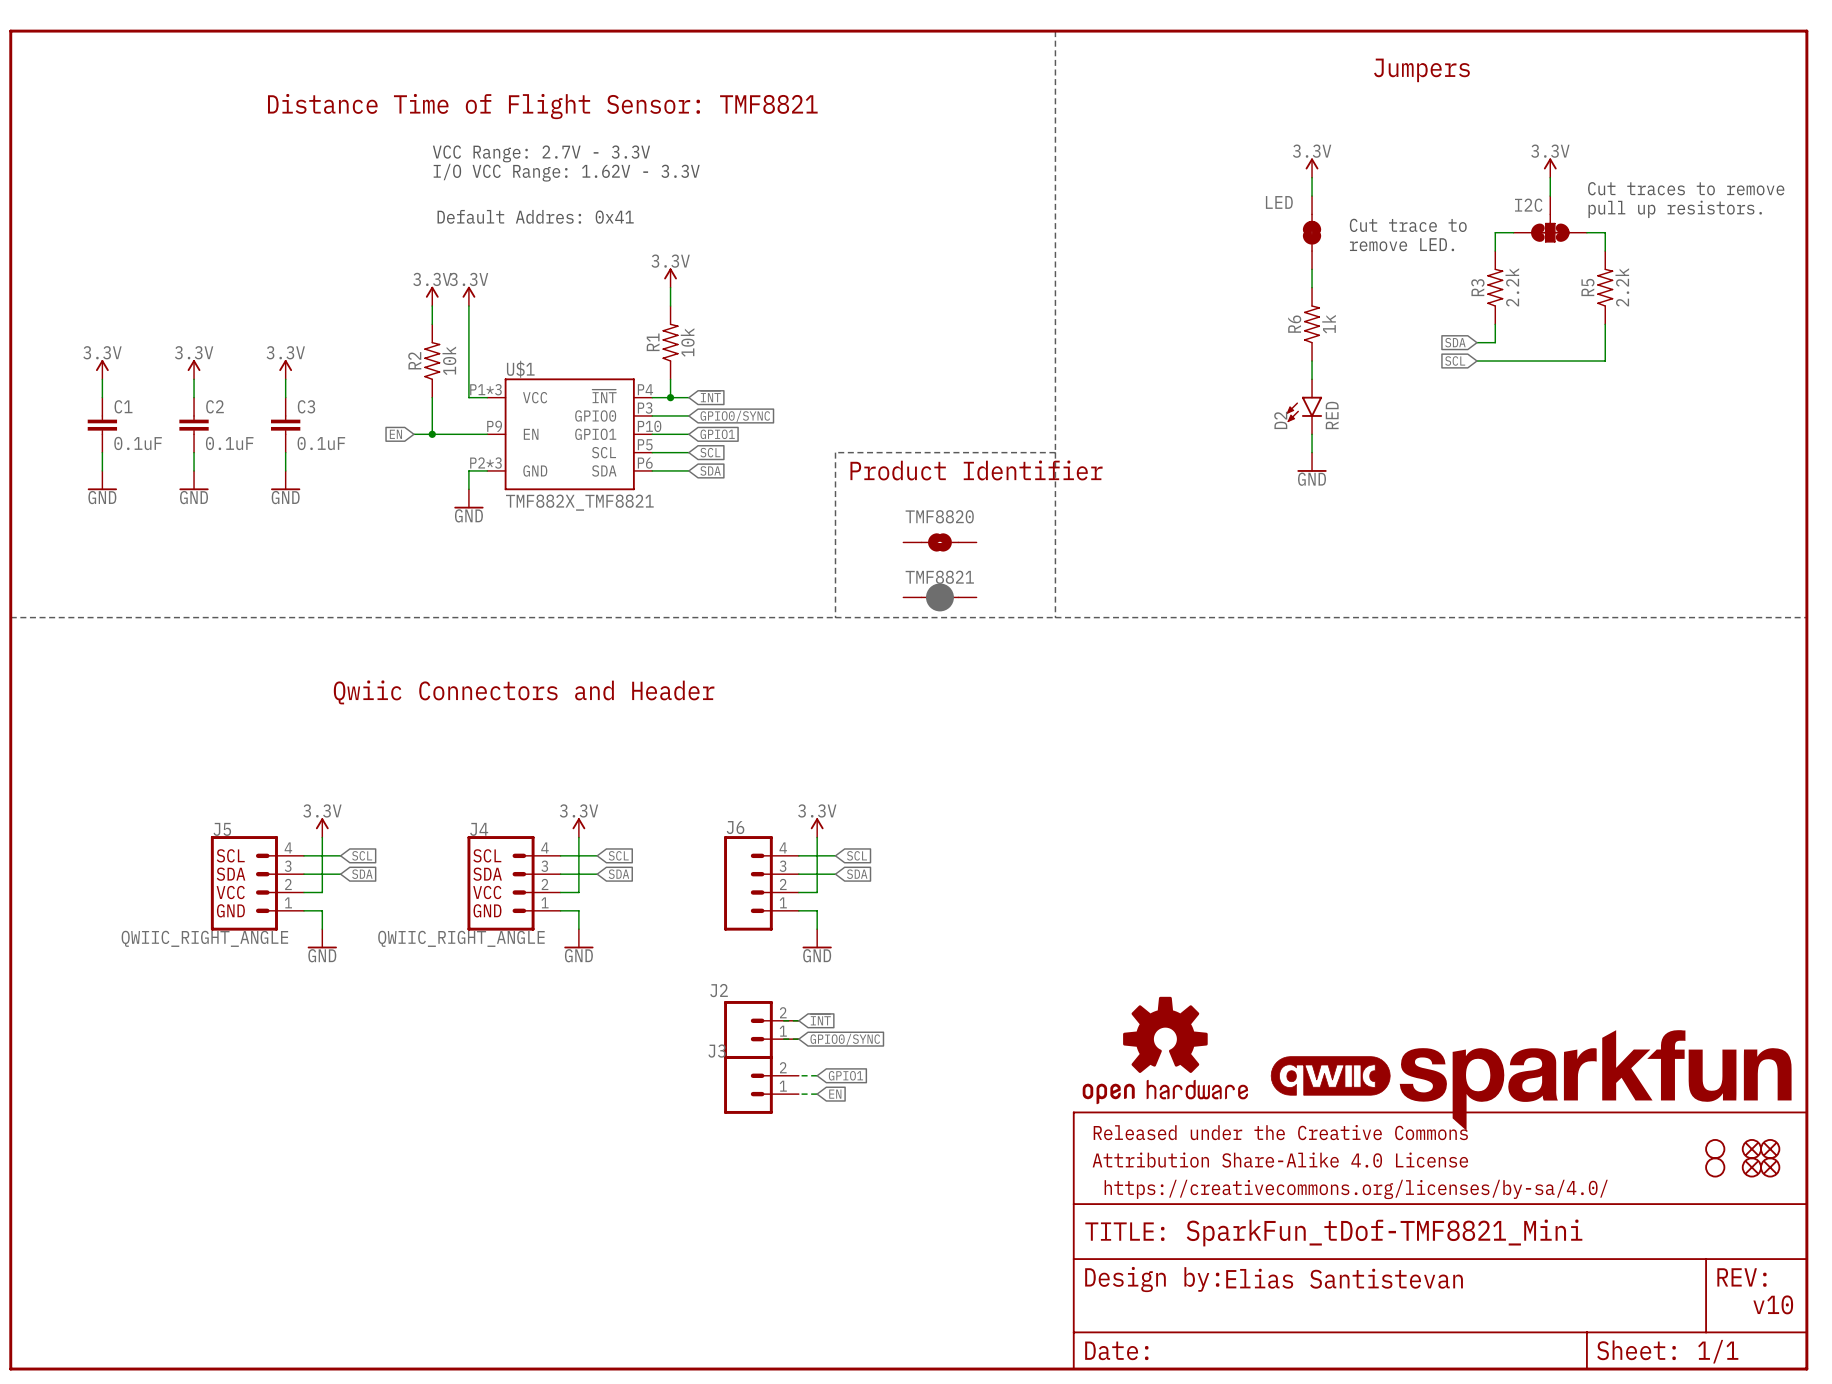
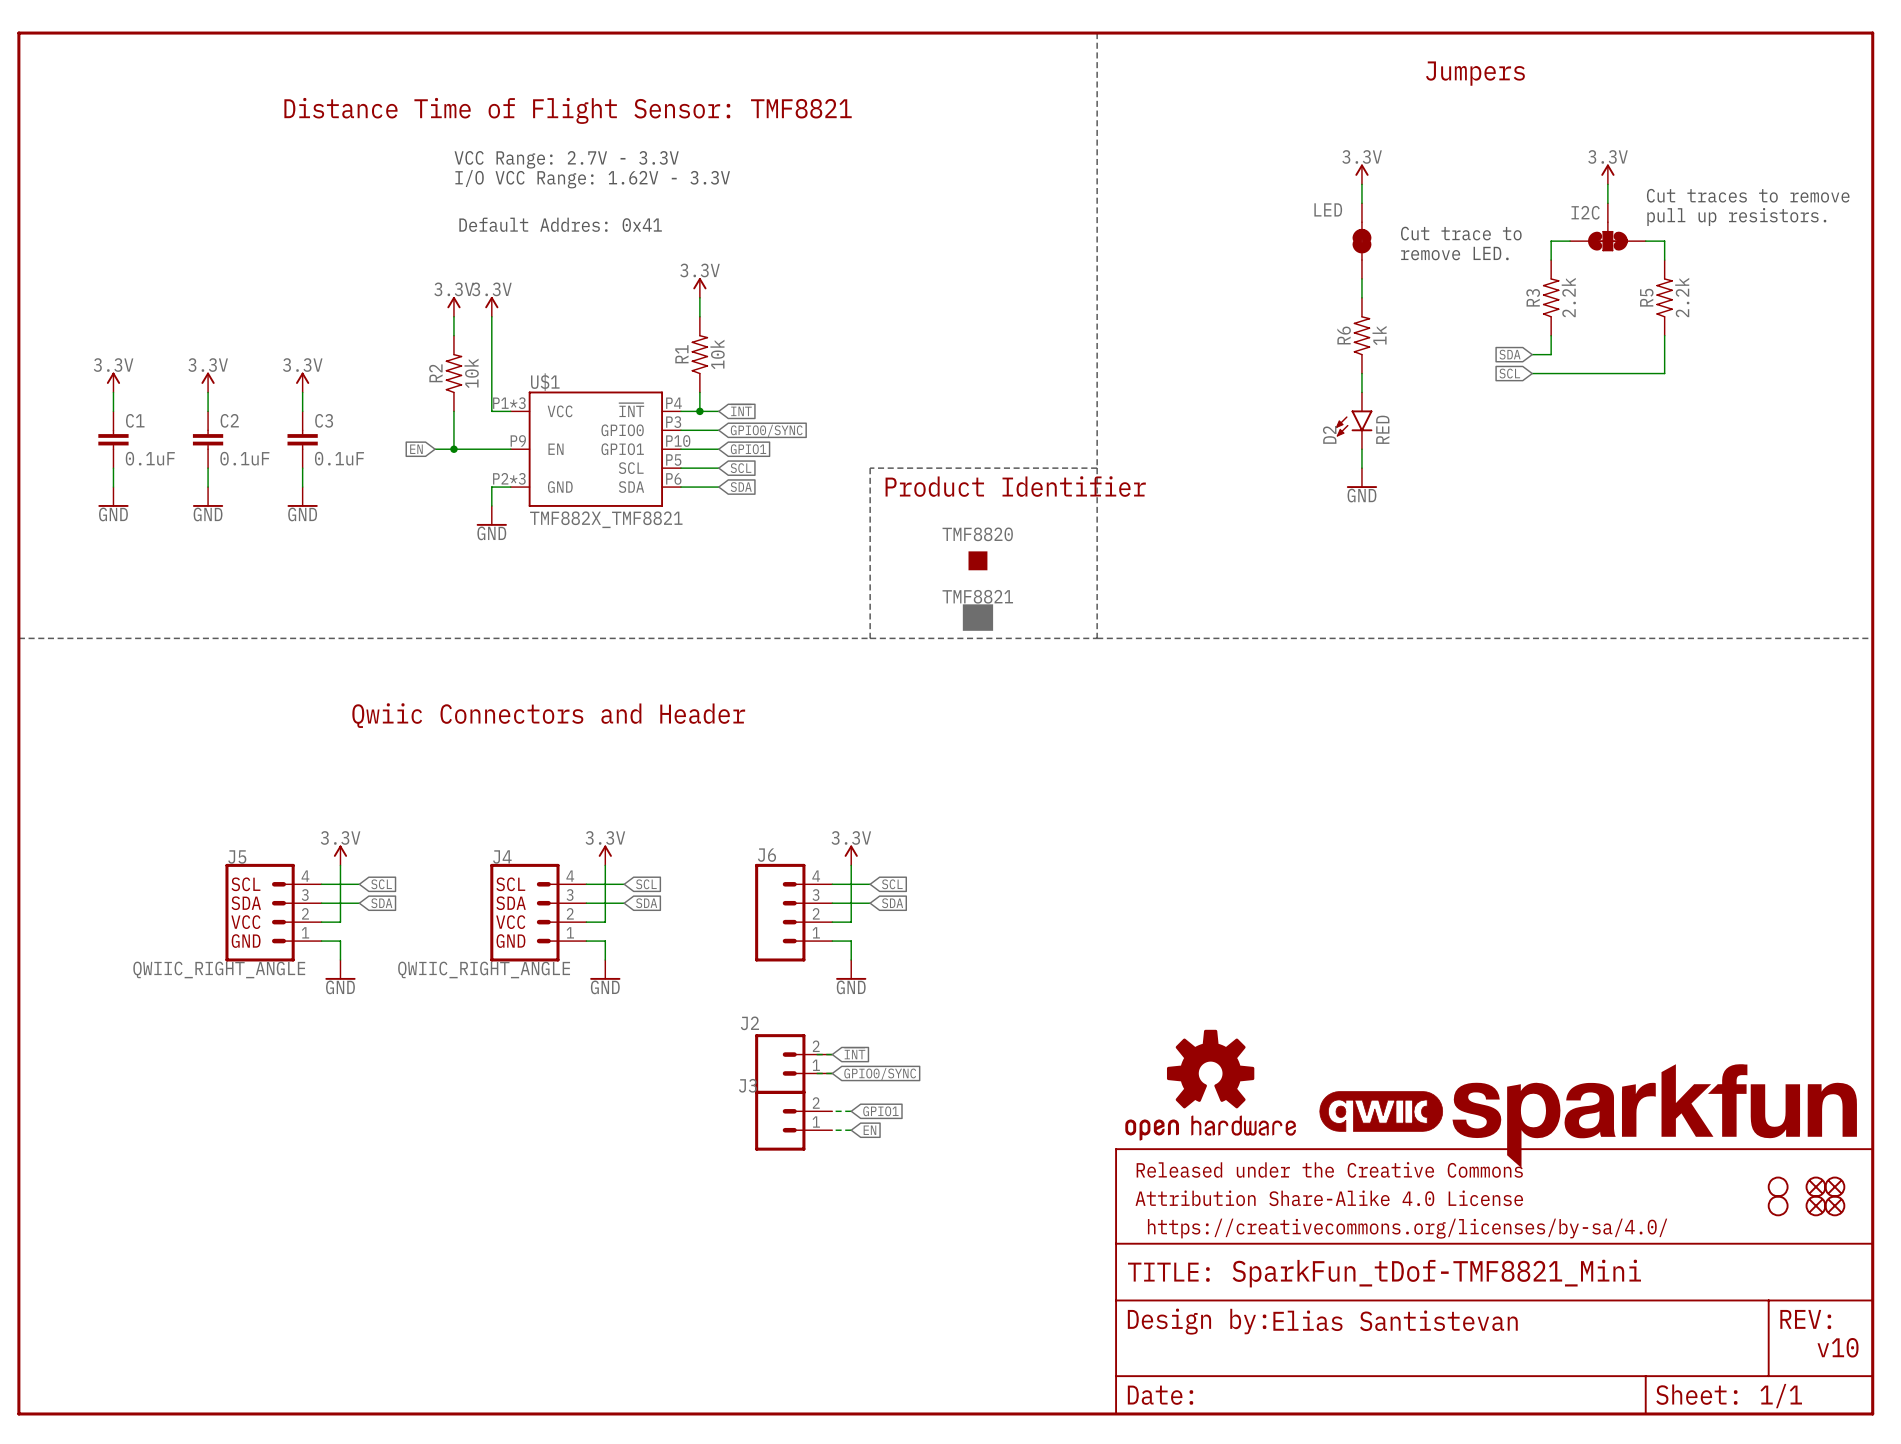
TMF8820 symbol: [903, 533, 977, 552] -> [968, 551, 988, 571]
TMF8821 symbol: [903, 583, 977, 612] -> [962, 604, 994, 631]

